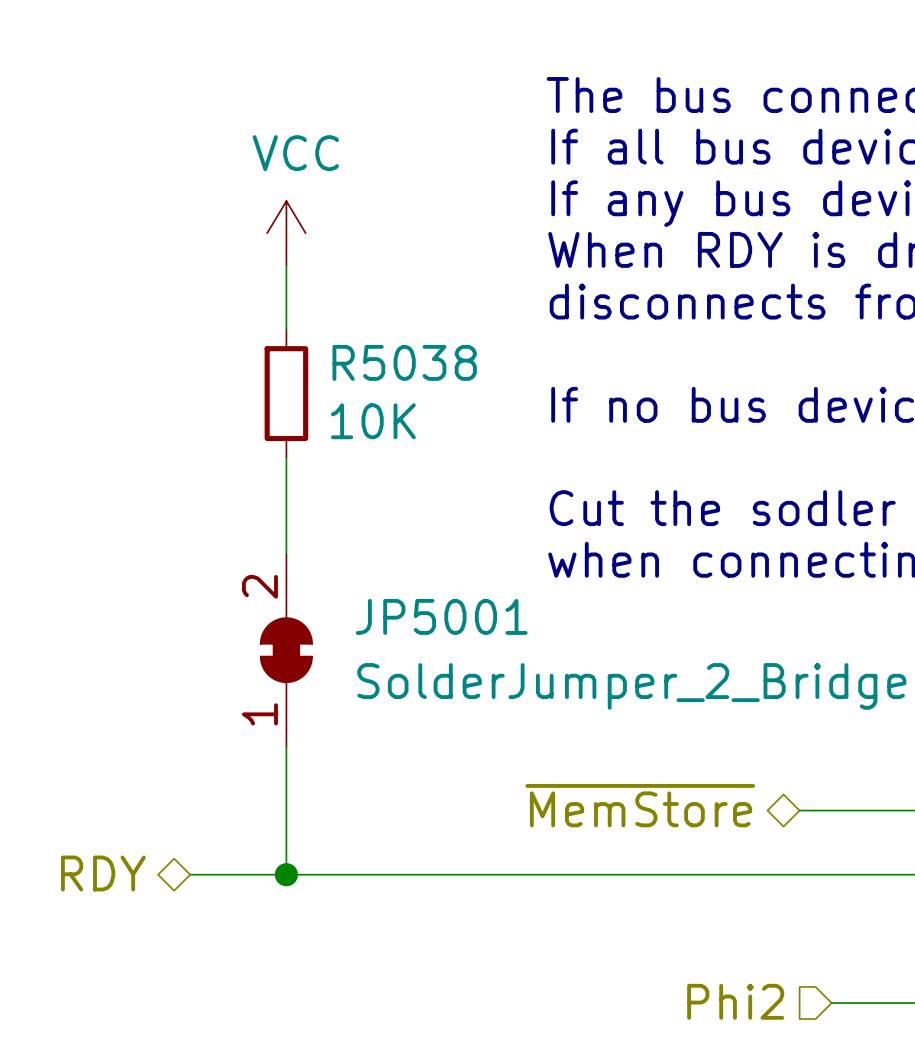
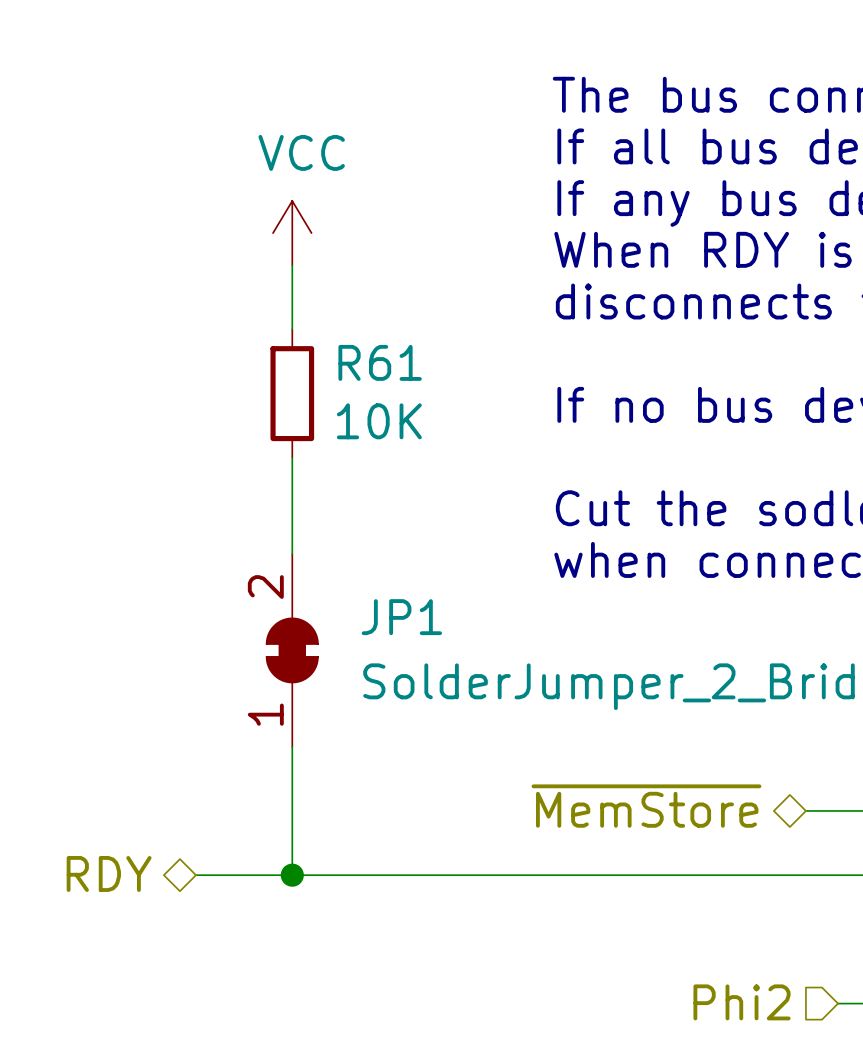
R5038 name: R5038 (404, 362) -> R61 (380, 362)
JP5001 name: JP5001 (441, 616) -> JP1 (401, 617)

